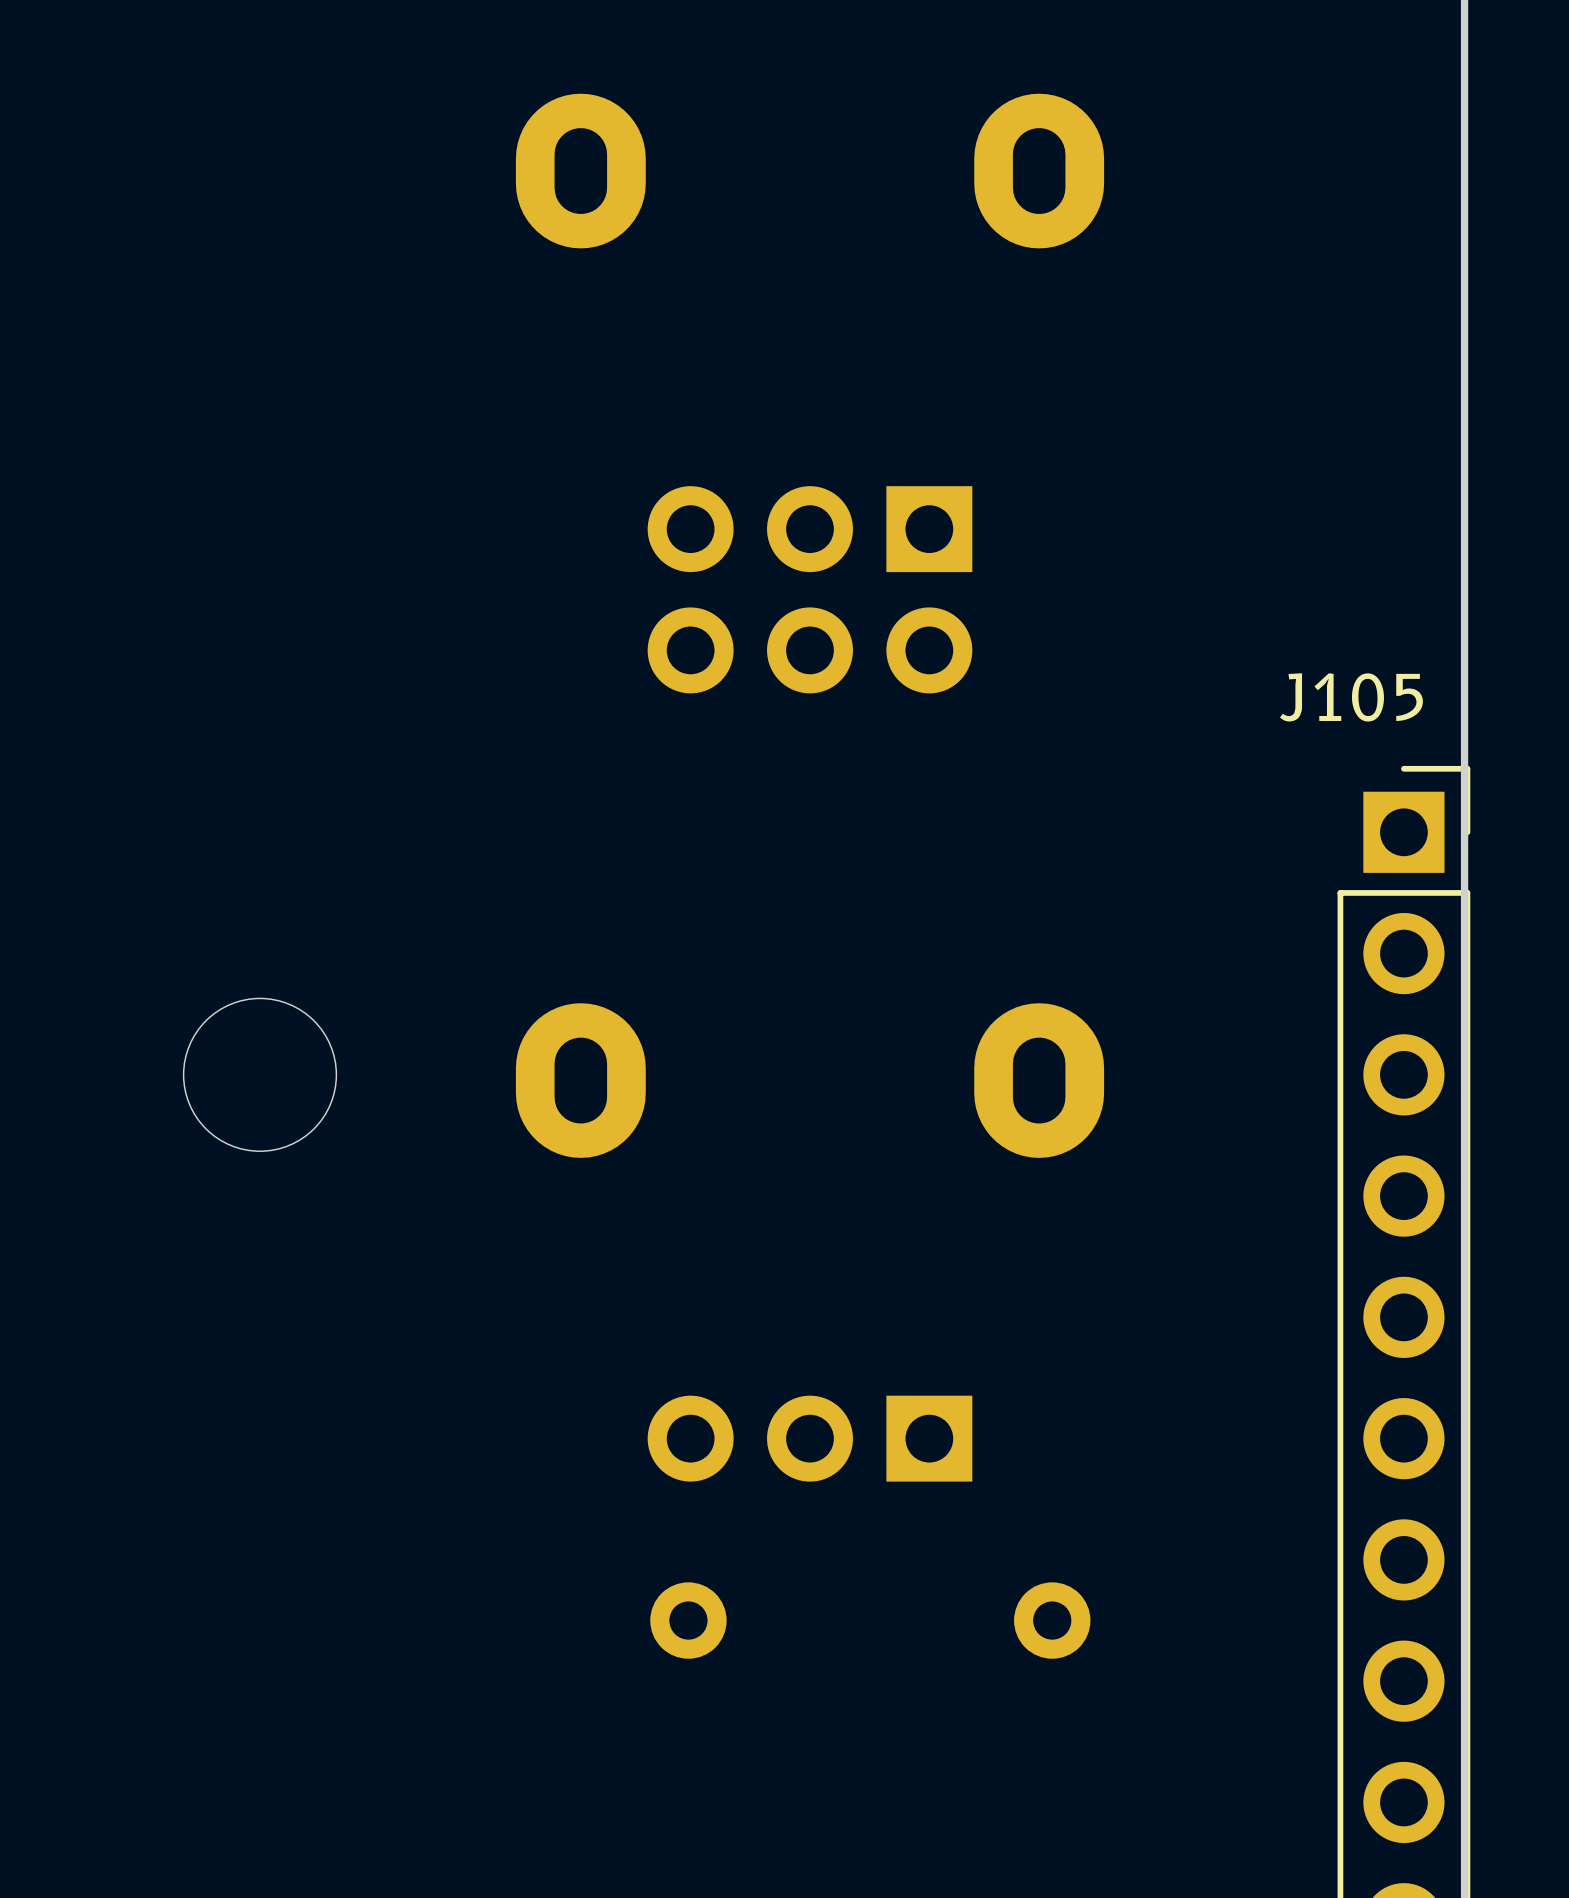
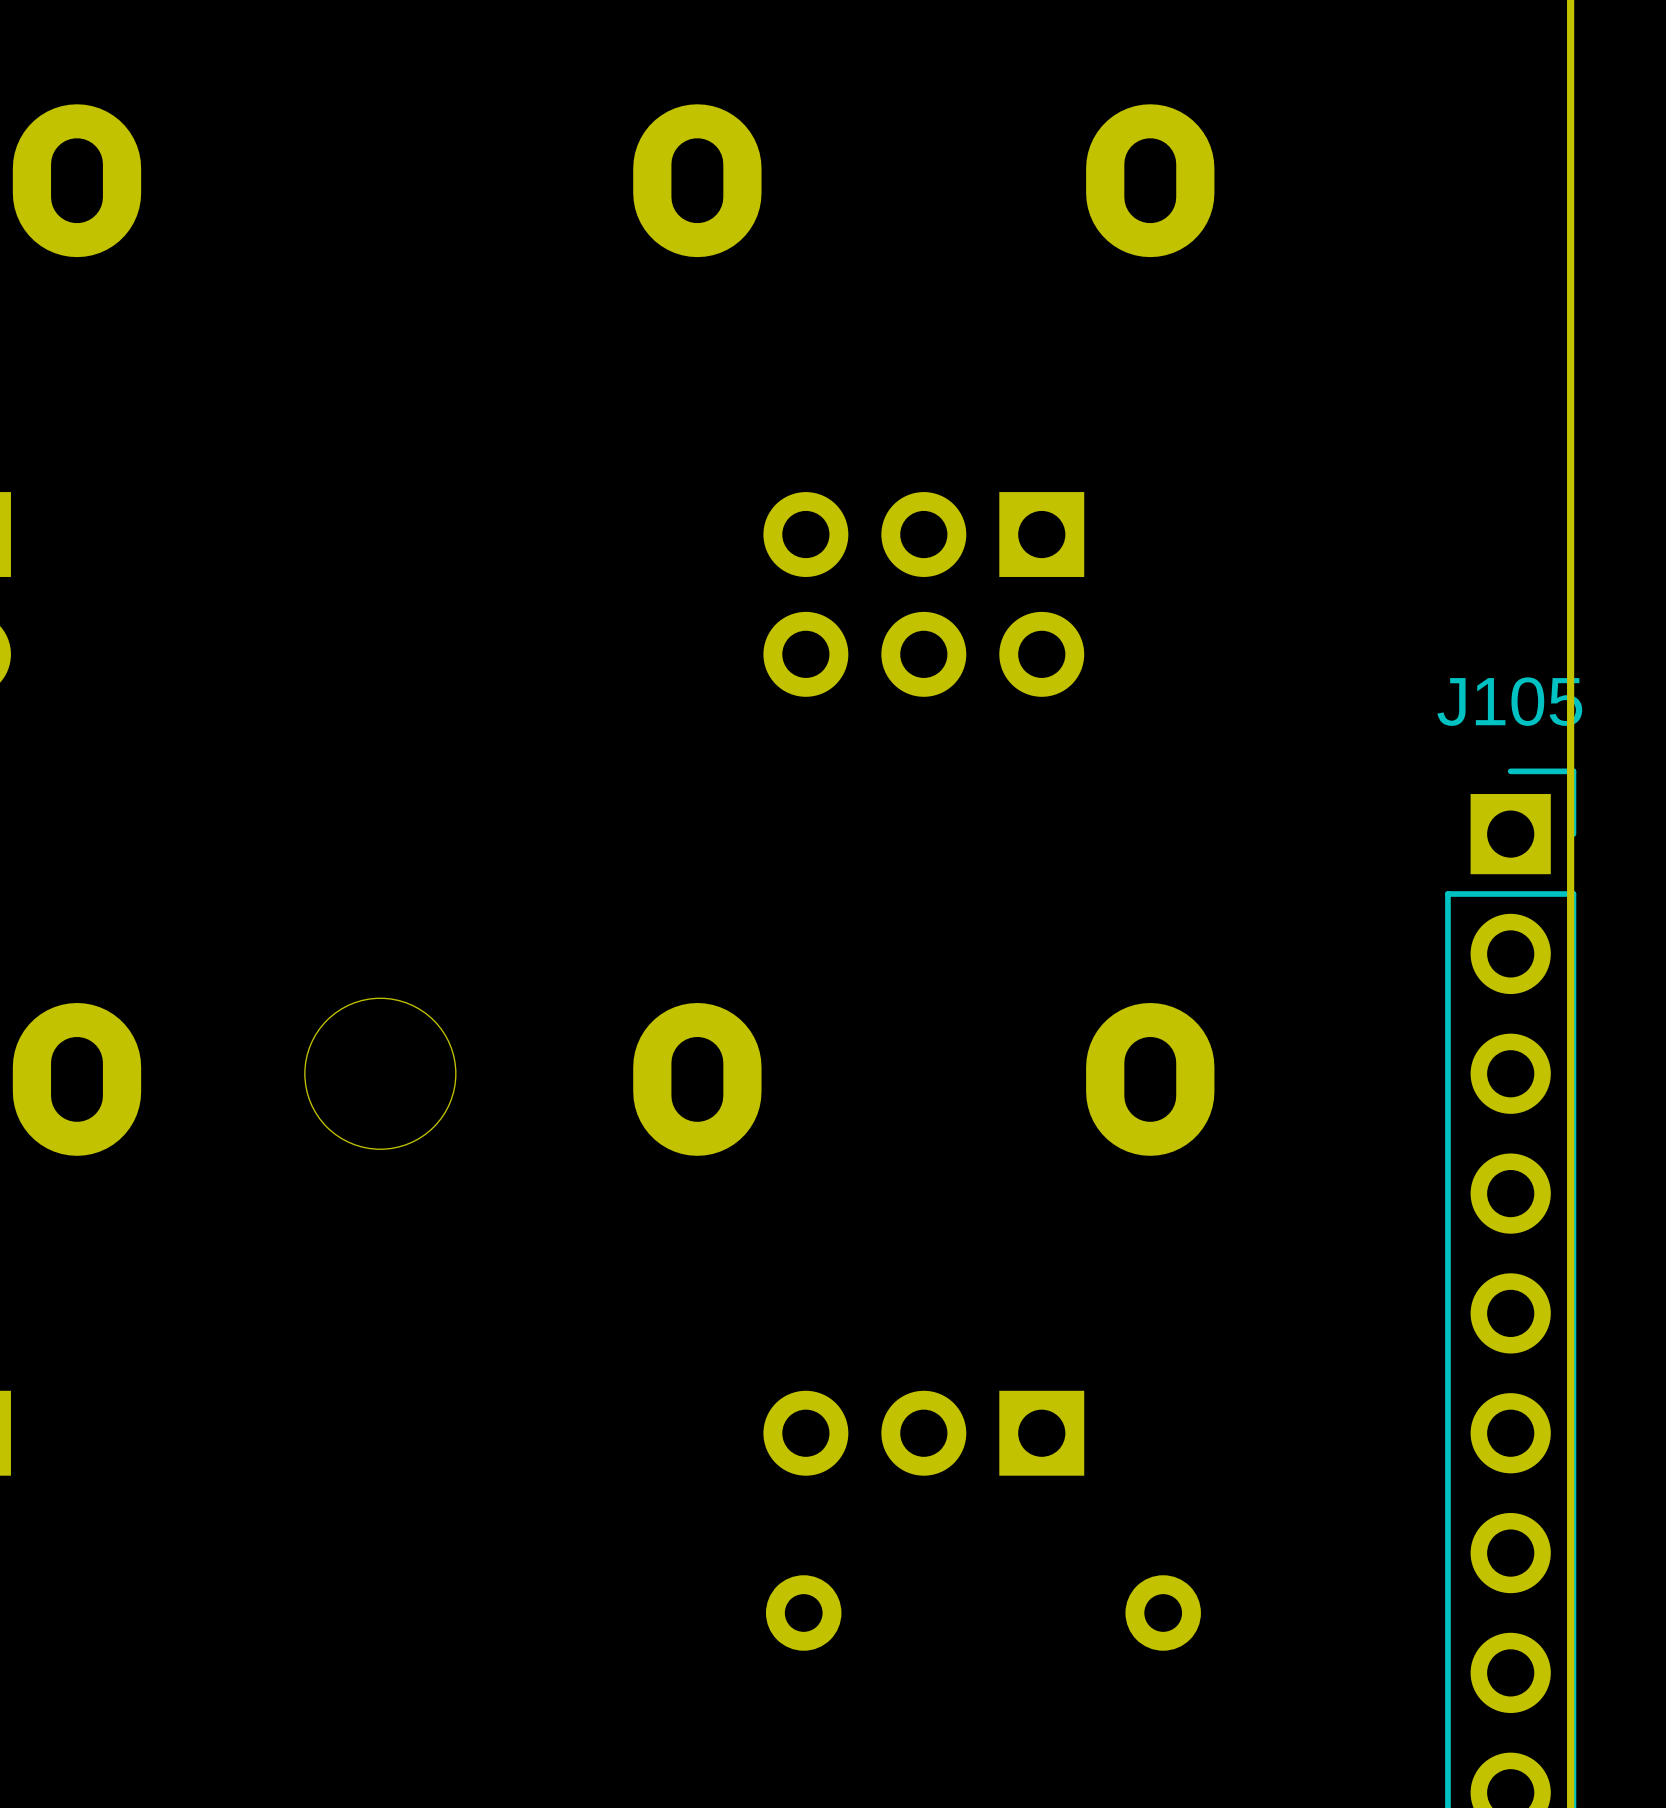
J105 name position: J105 (1351, 697) -> J105 (1509, 701)

